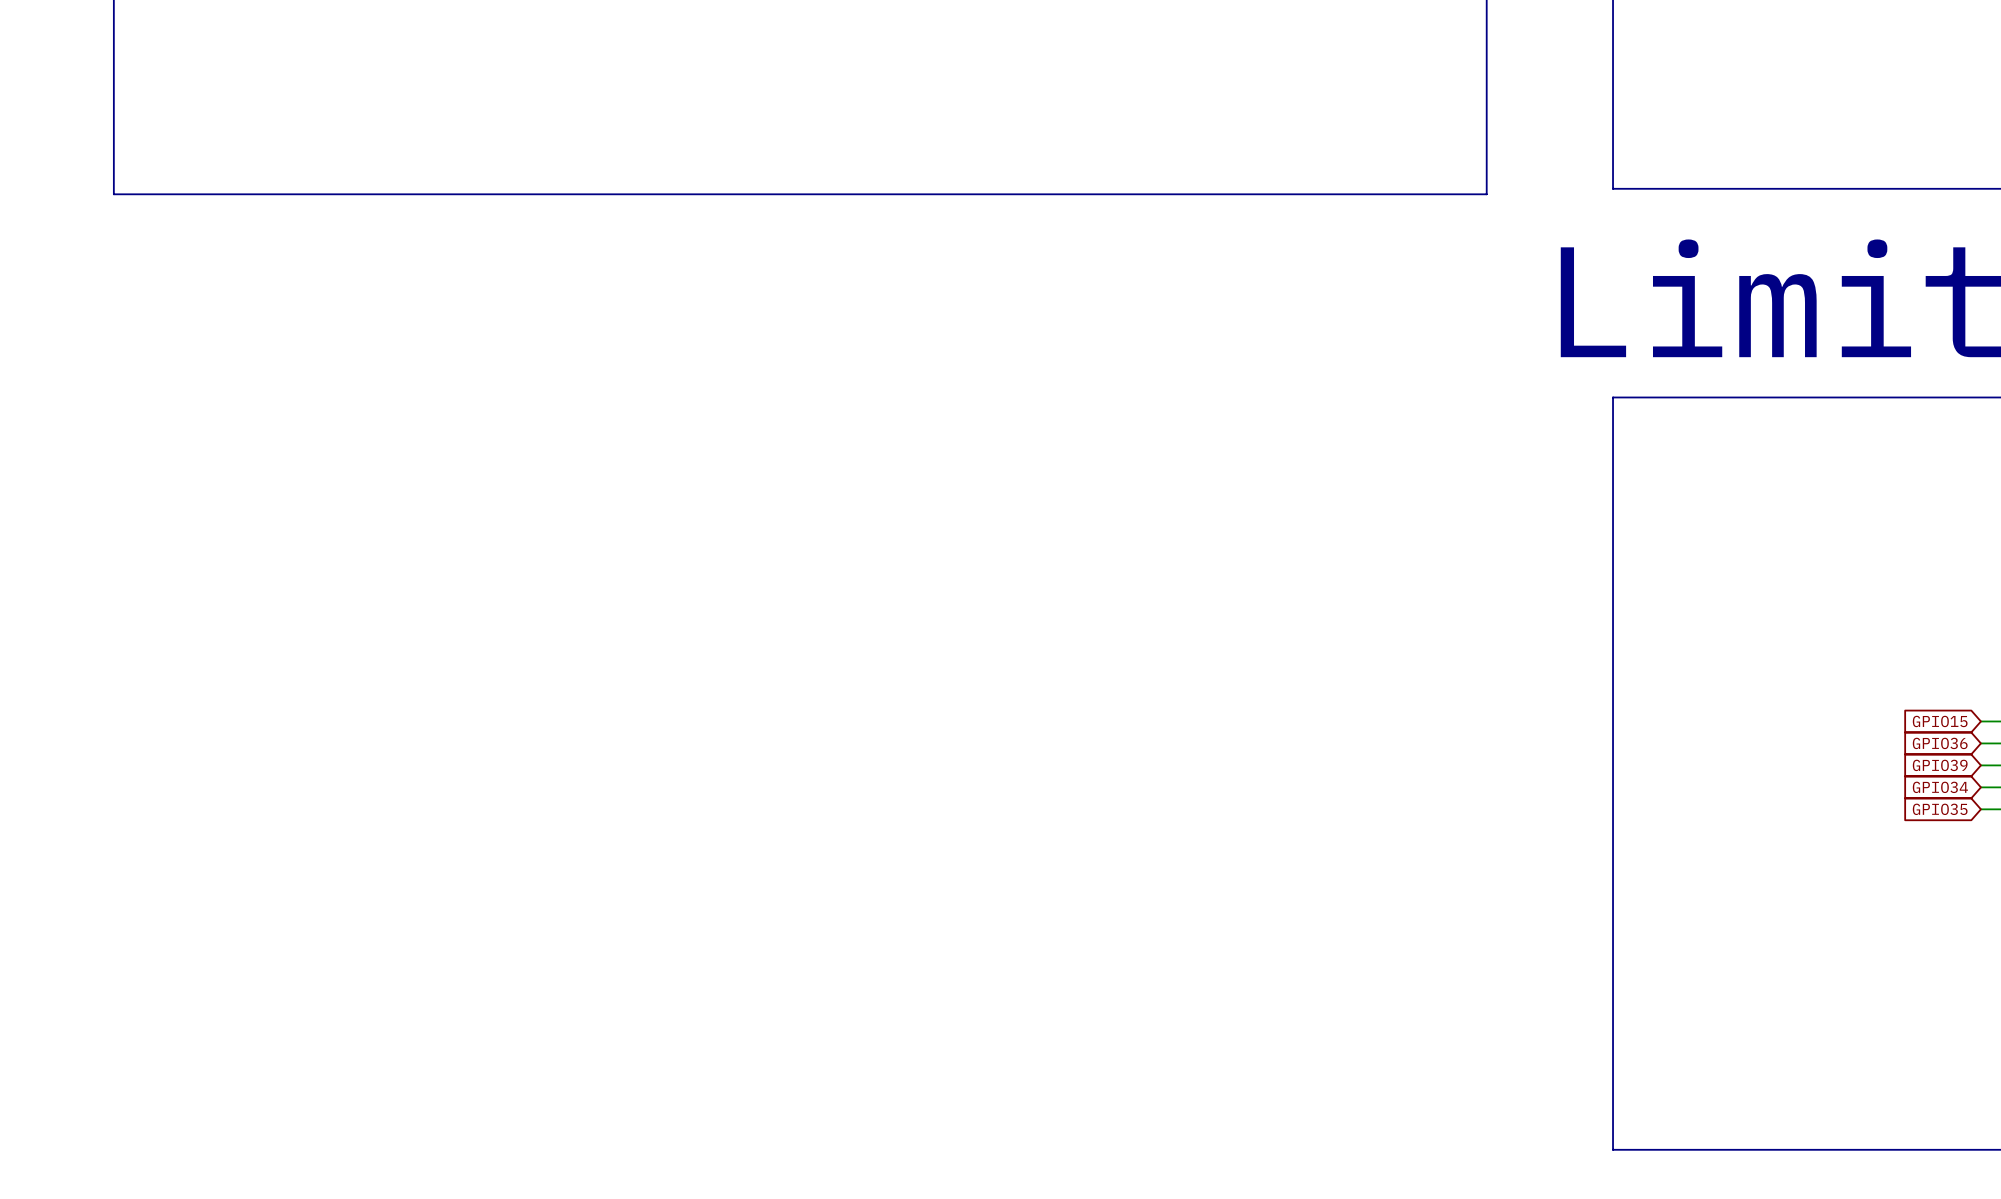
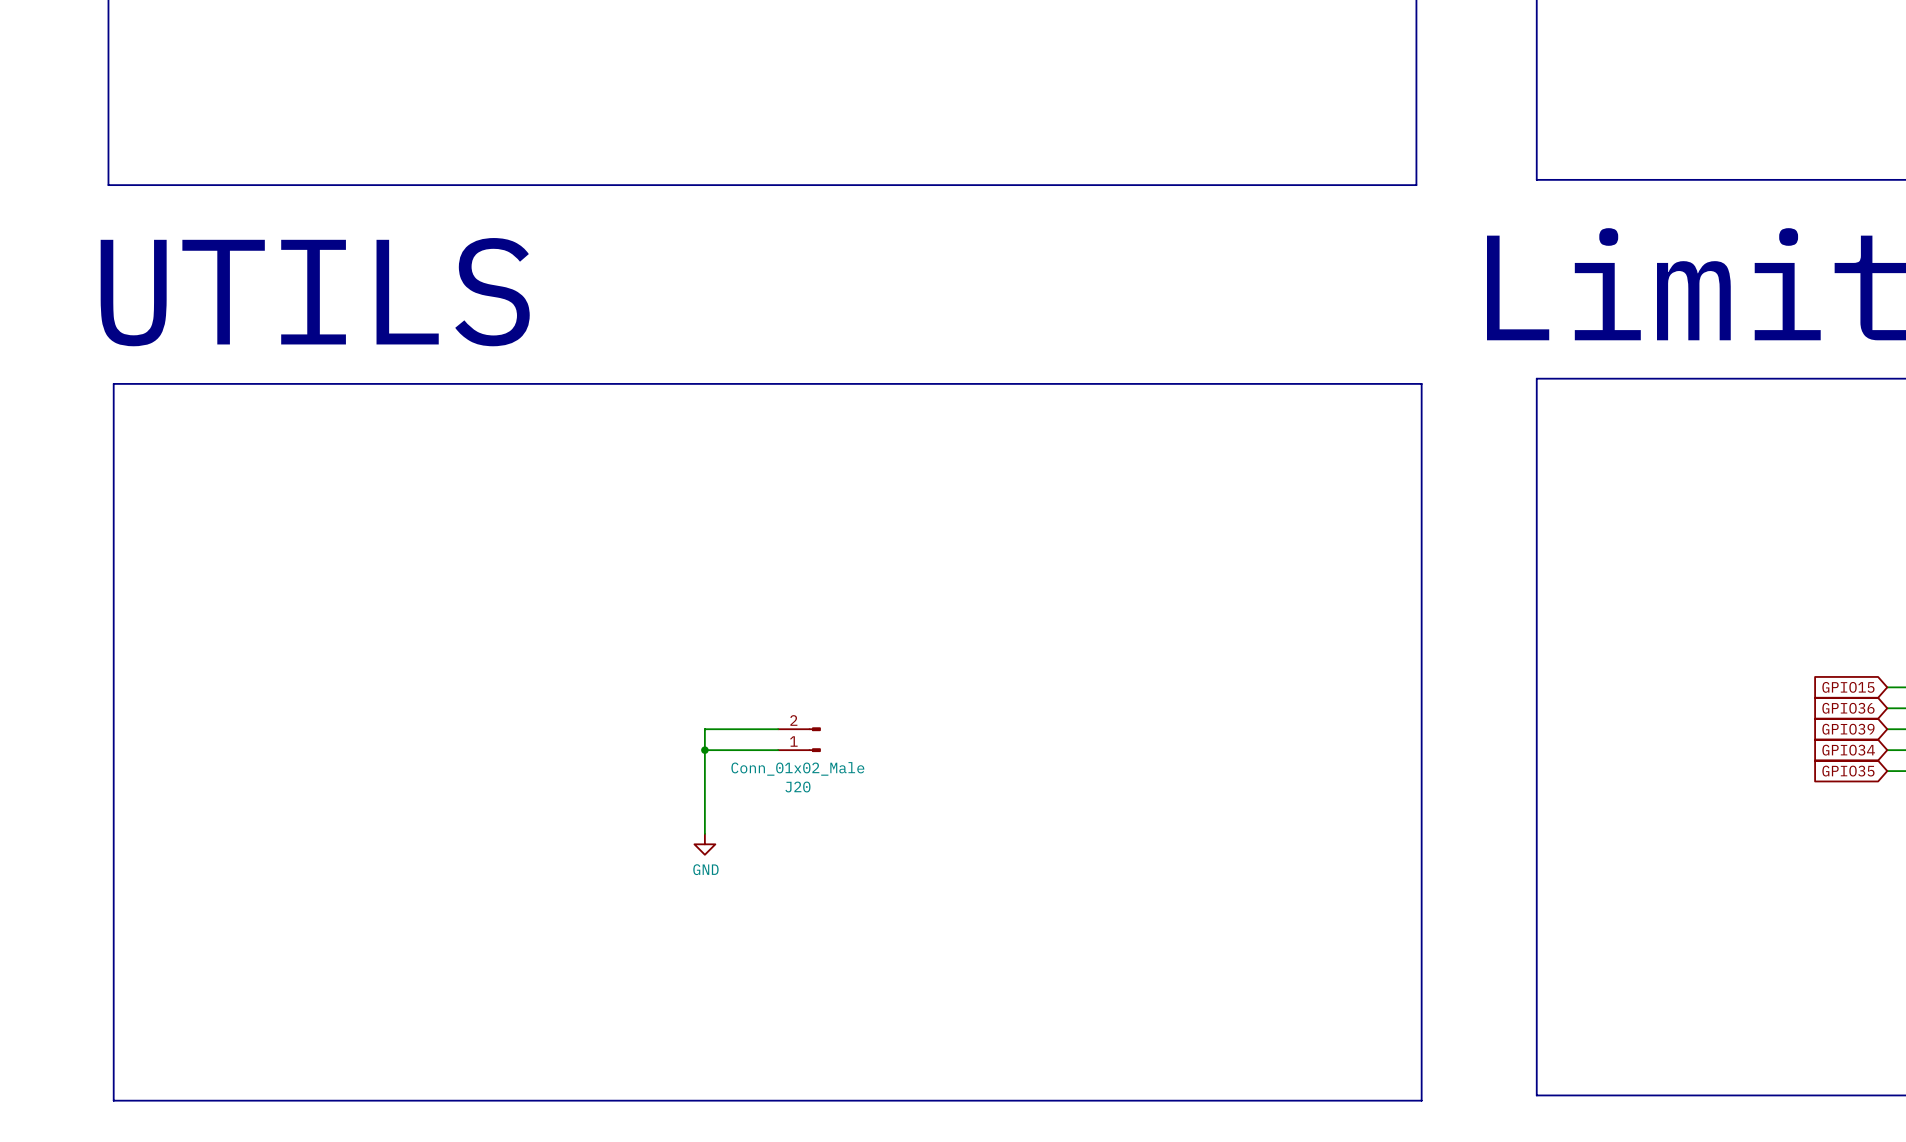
text: none -> UTILS (315, 292)
line: none -> (113, 383) (1421, 383) (1421, 1100) (113, 1100) (113, 383)
wire: none -> (778, 729) (704, 729) (704, 833)
J20: none -> Conn_01x02_Male (799, 739)
wire: none -> (704, 750) (778, 750)
junction: none -> (704, 750)
power symbol: none -> GND (704, 844)

